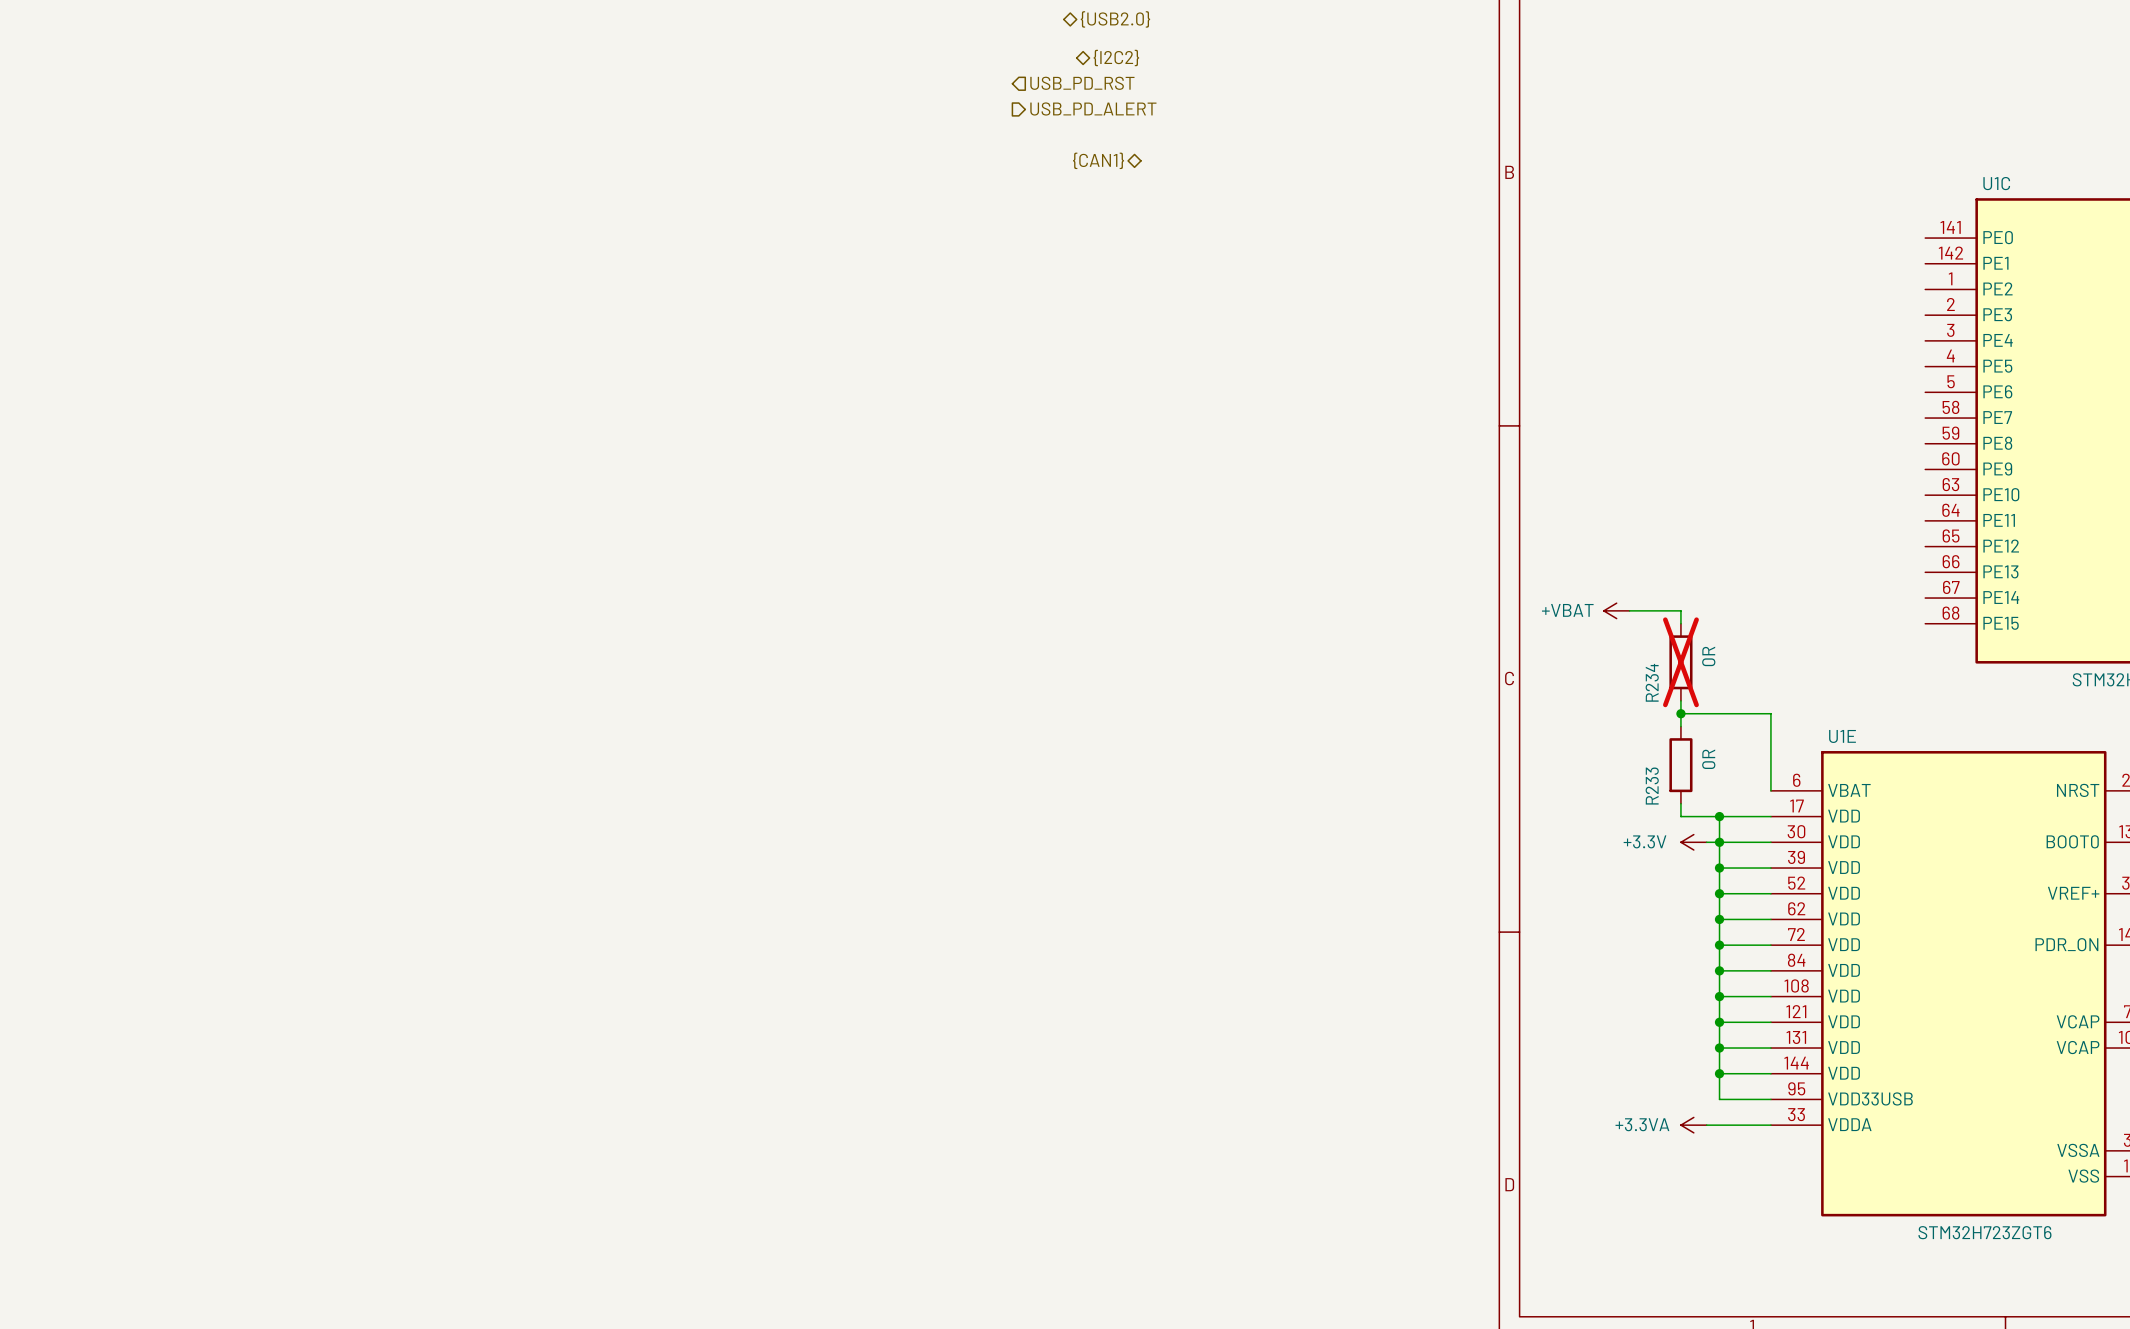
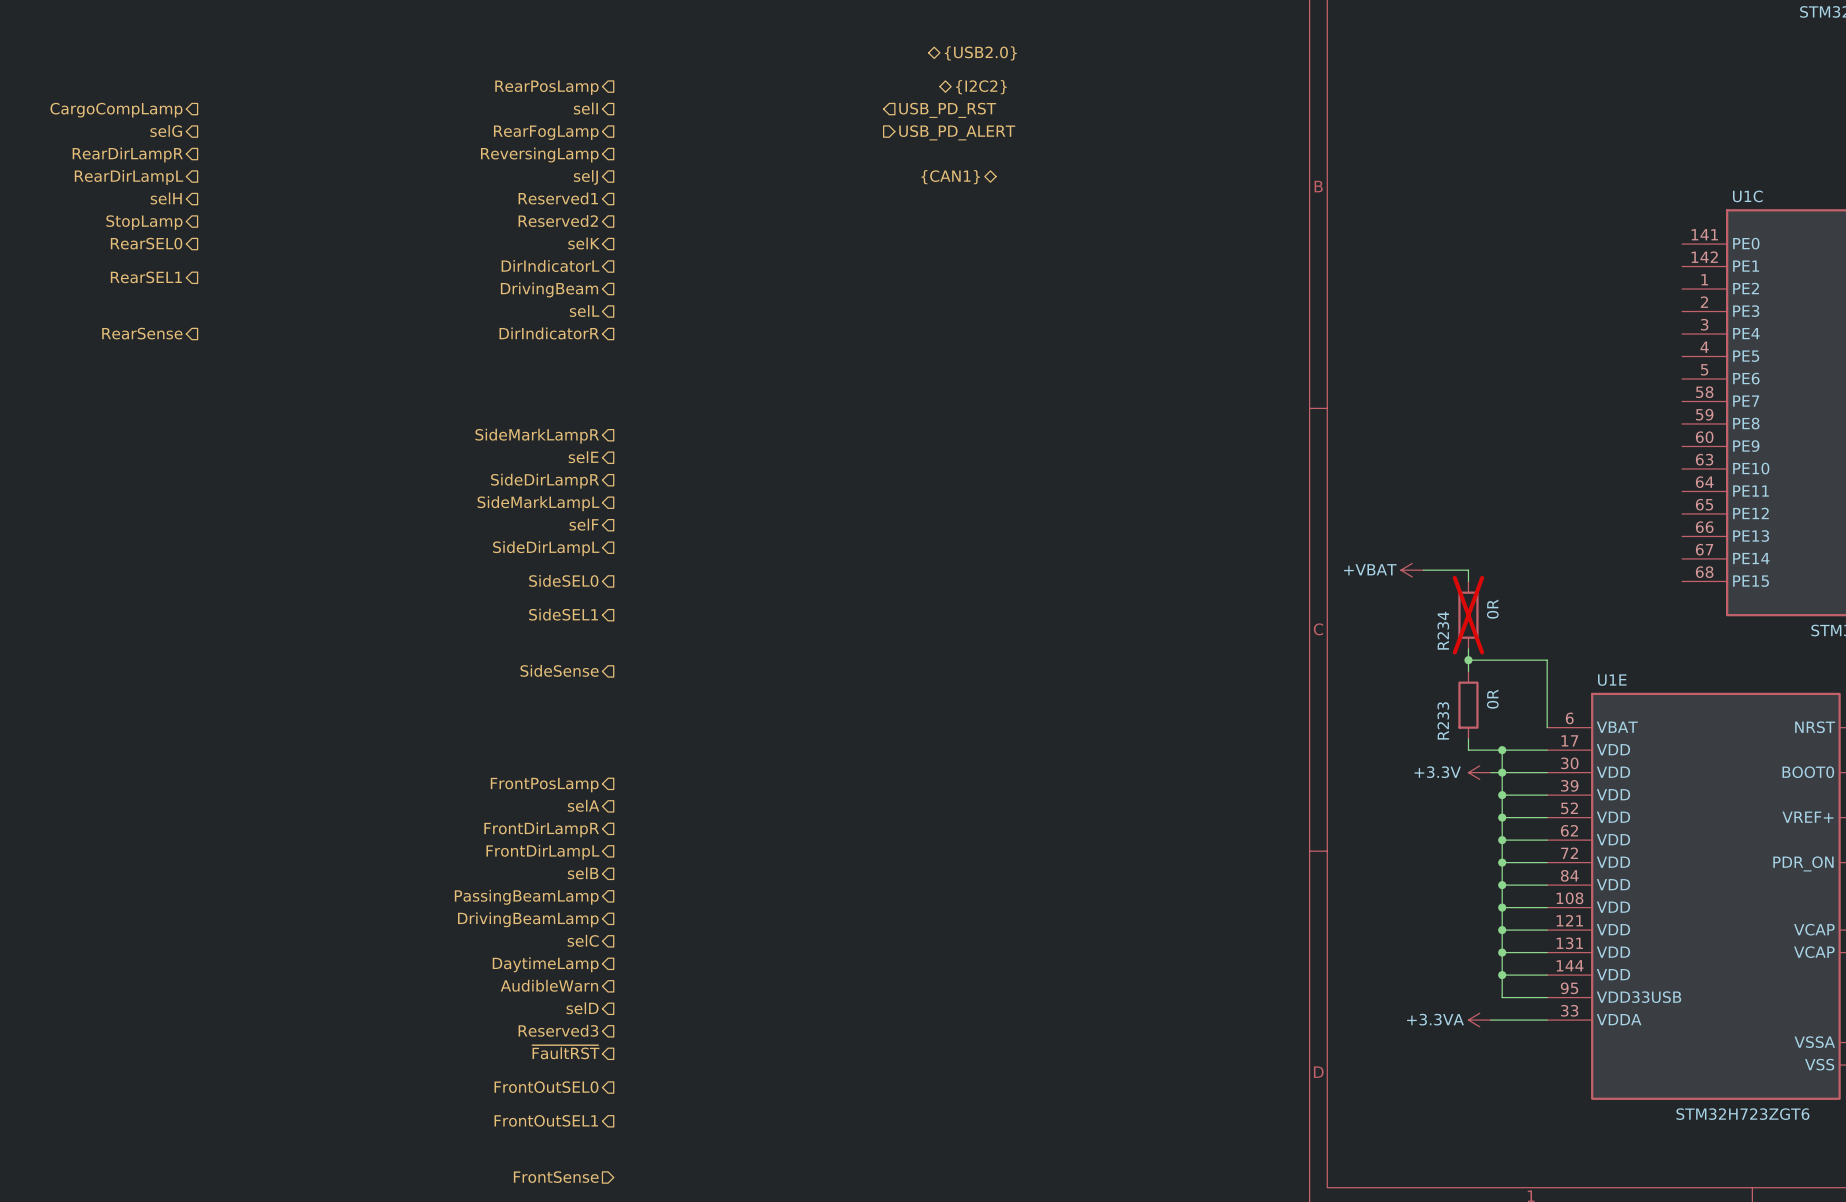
hierarchical label: none -> RearPosLamp (546, 87)
hierarchical label: none -> selI (585, 108)
hierarchical label: none -> CargoCompLamp (116, 110)
hierarchical label: none -> selG (166, 131)
hierarchical label: none -> RearFogLamp (546, 132)
hierarchical label: none -> RearDirLampR (127, 155)
hierarchical label: none -> ReversingLamp (539, 155)
hierarchical label: none -> selJ (585, 177)
hierarchical label: none -> RearDirLampL (129, 177)
hierarchical label: none -> selH (166, 198)
hierarchical label: none -> Reserved1 (558, 198)
hierarchical label: none -> Reserved2 (558, 220)
hierarchical label: none -> StopLamp (144, 222)
hierarchical label: none -> RearSEL0 (146, 243)
hierarchical label: none -> selK (584, 243)
hierarchical label: none -> DirIndicatorL (550, 265)
hierarchical label: none -> RearSEL1 (146, 277)
hierarchical label: none -> DrivingBeam (549, 289)
hierarchical label: none -> selL (584, 310)
hierarchical label: none -> RearSense (142, 333)
hierarchical label: none -> DirIndicatorR (549, 333)
hierarchical label: none -> SideMarkLampR (537, 436)
hierarchical label: none -> selE (583, 457)
hierarchical label: none -> SideDirLampR (544, 481)
hierarchical label: none -> SideMarkLampL (538, 503)
hierarchical label: none -> selF (584, 524)
hierarchical label: none -> SideDirLampL (546, 548)
hierarchical label: none -> SideSEL0 (563, 580)
hierarchical label: none -> SideSEL1 (563, 614)
hierarchical label: none -> SideSense (559, 670)
hierarchical label: none -> FrontPosLamp (544, 785)
hierarchical label: none -> selA (583, 805)
hierarchical label: none -> FrontDirLampR (541, 829)
hierarchical label: none -> FrontDirLampL (542, 852)
hierarchical label: none -> selB (583, 873)
hierarchical label: none -> PassingBeamLamp (526, 897)
hierarchical label: none -> DrivingBeamLamp (528, 919)
hierarchical label: none -> selC (583, 940)
hierarchical label: none -> DaytimeLamp (545, 964)
hierarchical label: none -> AudibleWarn (549, 985)
hierarchical label: none -> selD (582, 1008)
hierarchical label: none -> Reserved3 (558, 1030)
hierarchical label: none -> ~{FaultRST} (565, 1052)
hierarchical label: none -> FrontOutSEL0 (546, 1087)
hierarchical label: none -> FrontOutSEL1 (546, 1120)
hierarchical label: none -> FrontSense (556, 1177)

